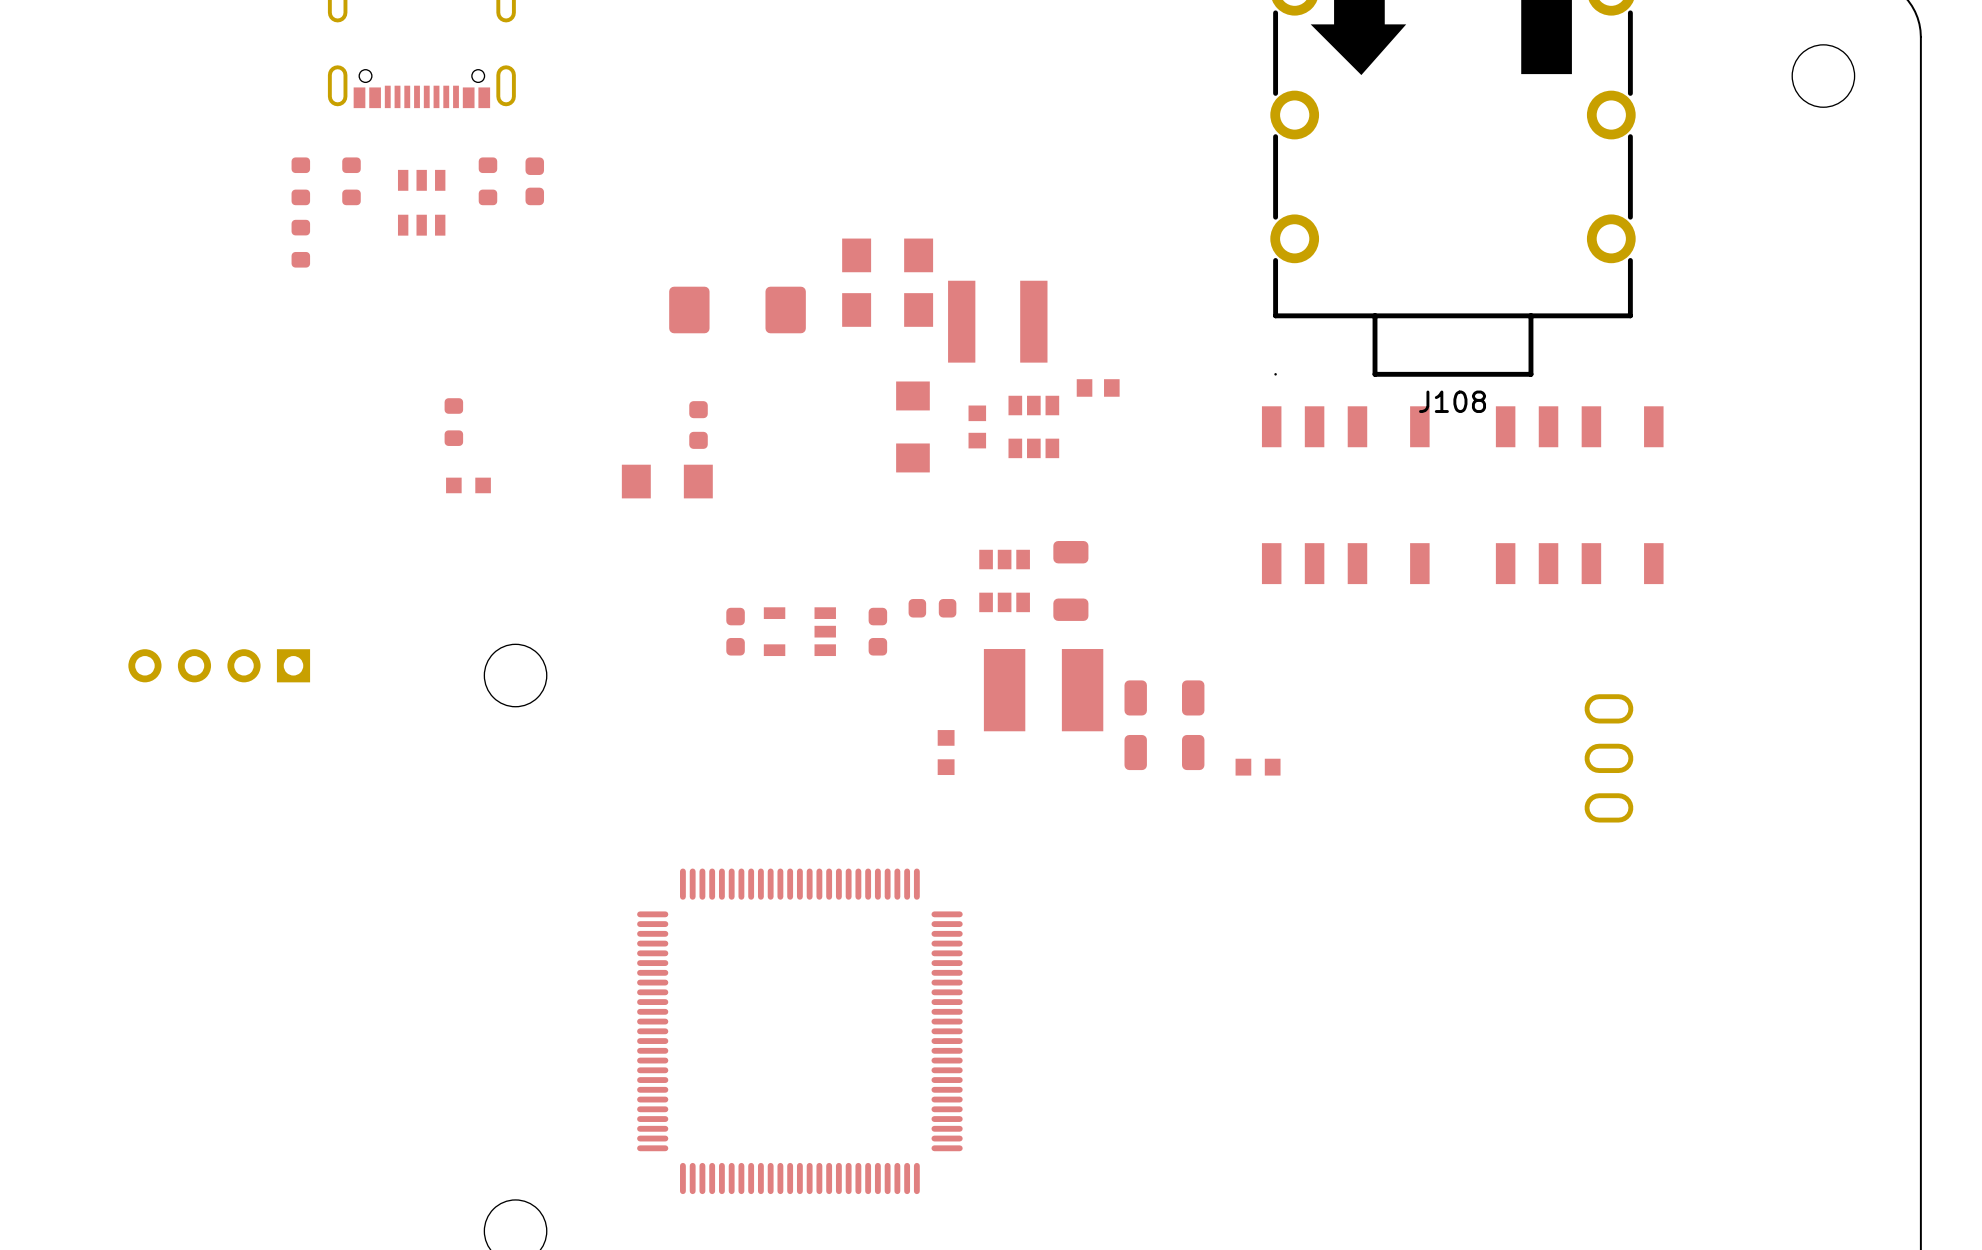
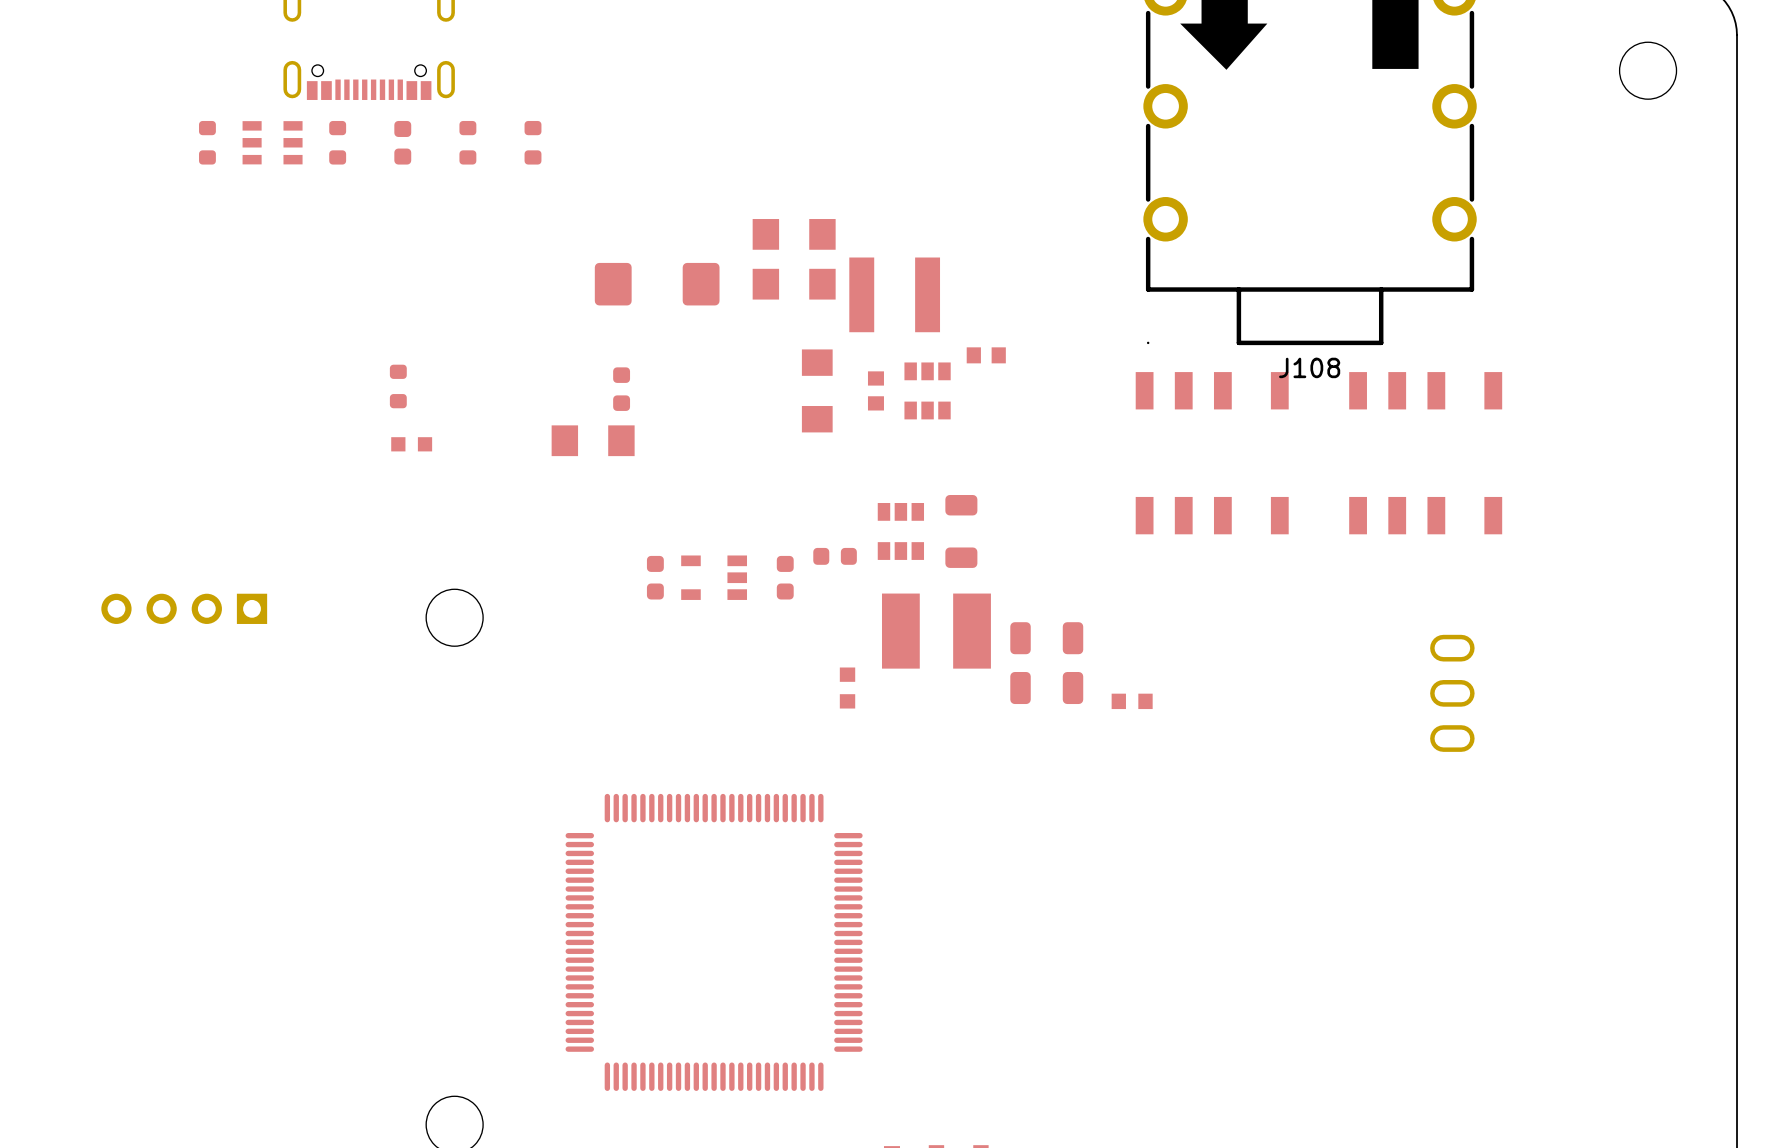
part: none -> (207, 142)
part: none -> (533, 142)
part: (300, 181) -> none
part position: (351, 181) -> (337, 142)
part position: (487, 181) -> (467, 142)
part position: (534, 181) -> (402, 142)
part rotation: 0° (421, 202) -> 90° clockwise (272, 142)
part position: (421, 202) -> (272, 142)
part: (300, 243) -> none

